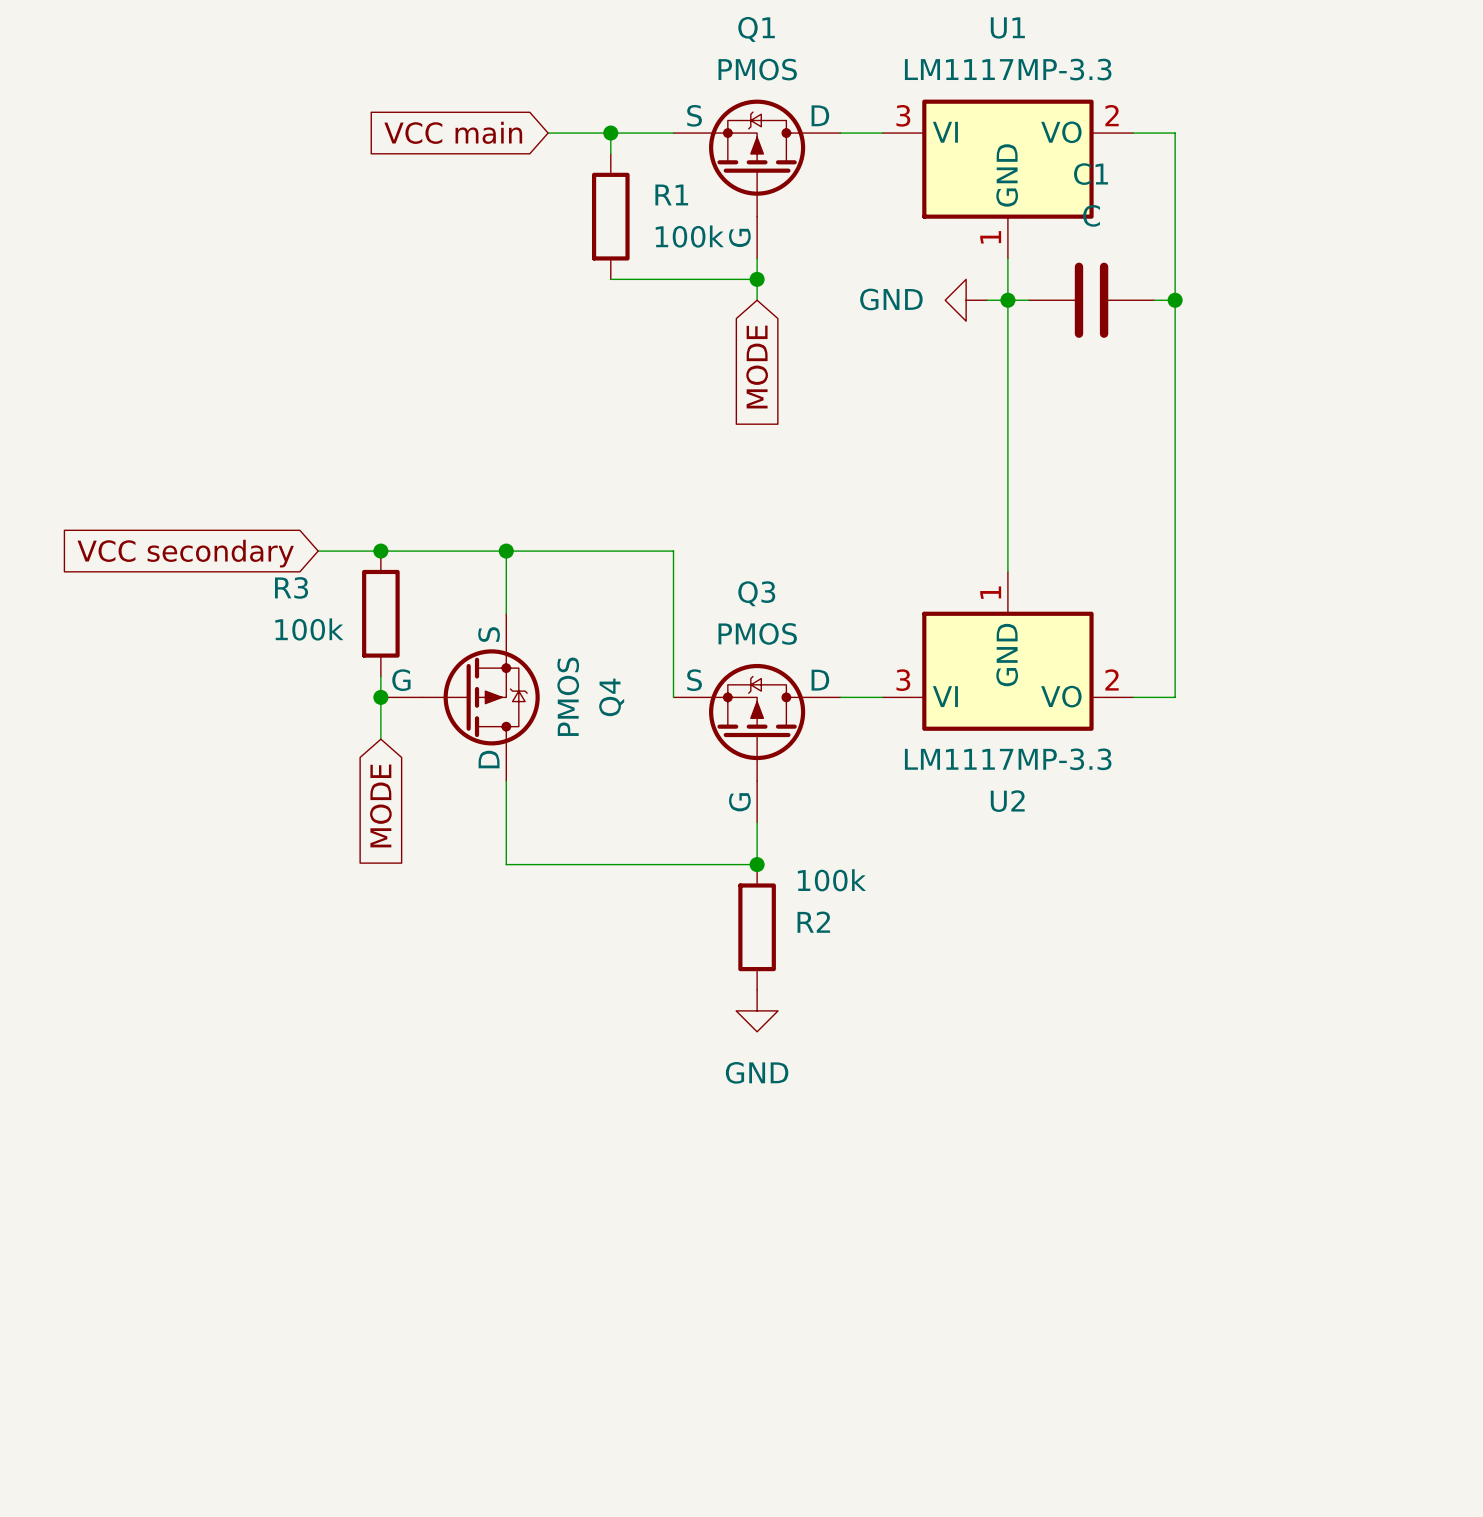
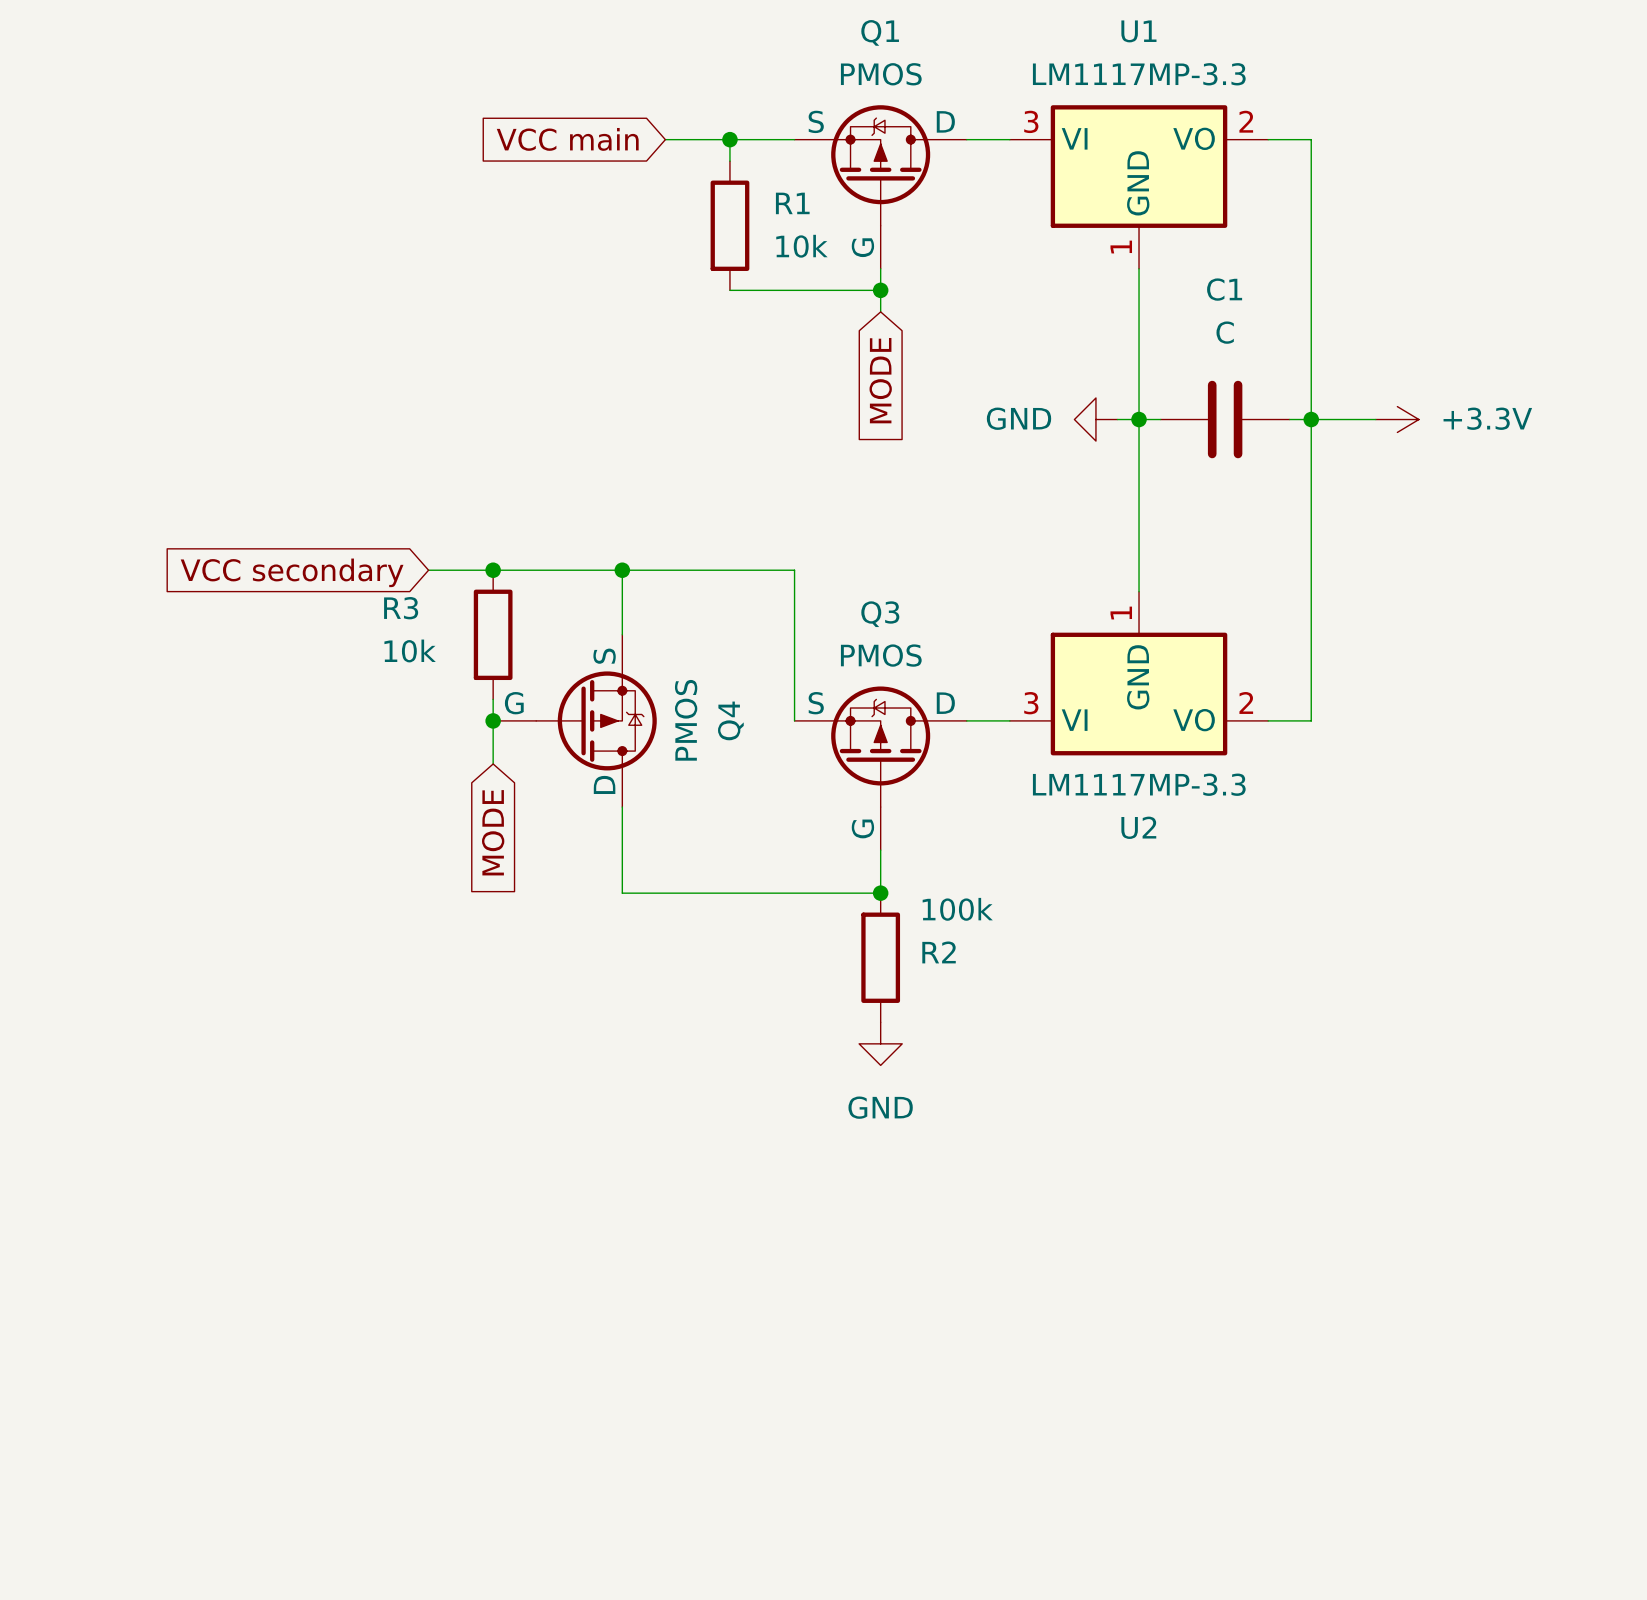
R1 value: 100k (689, 236) -> 10k (801, 246)
power symbol position: GND (966, 300) -> GND (1095, 419)
wire: (987, 300) (1028, 300) -> (1117, 419) (1160, 419)
junction: (1007, 300) -> none
C1 position: (1091, 300) -> (1225, 419)
wire: (1154, 300) (1175, 300) -> none
junction: (1175, 300) -> none
junction: none -> (1139, 419)
wire: none -> (1289, 419) (1375, 419)
junction: none -> (1311, 419)
power symbol: none -> +3.3V (1397, 419)
R3 value: 100k (309, 629) -> 10k (410, 650)

